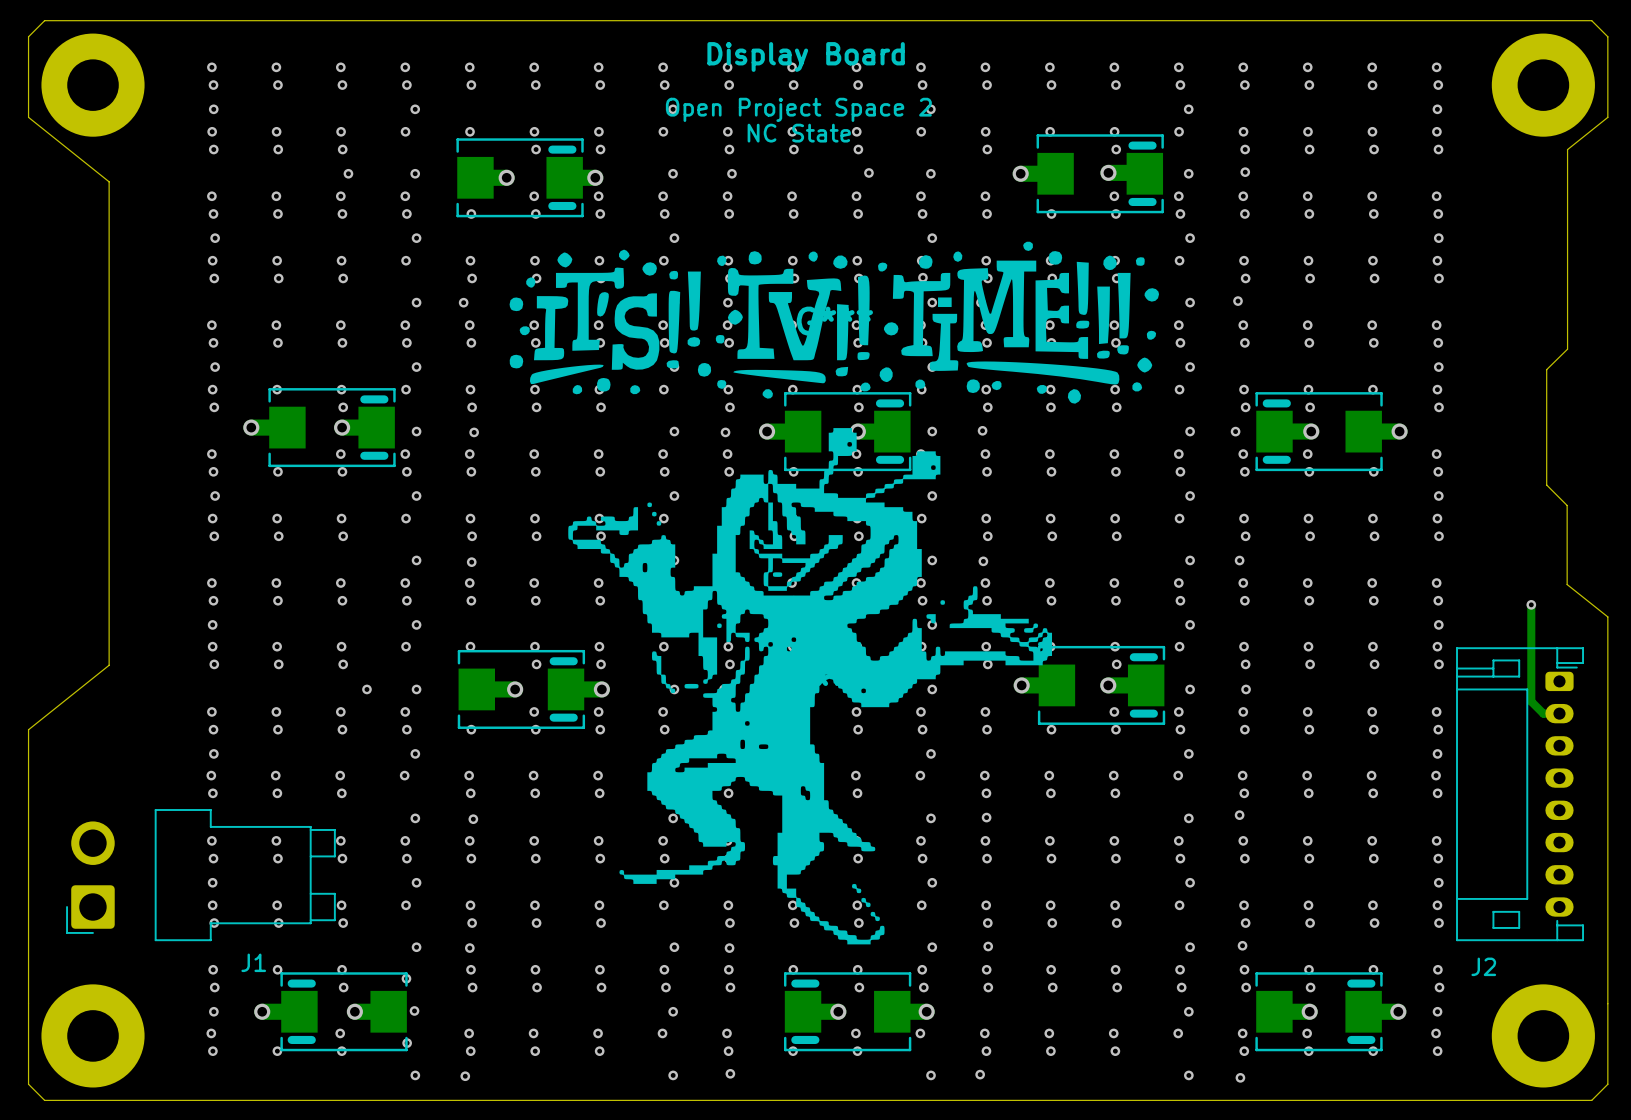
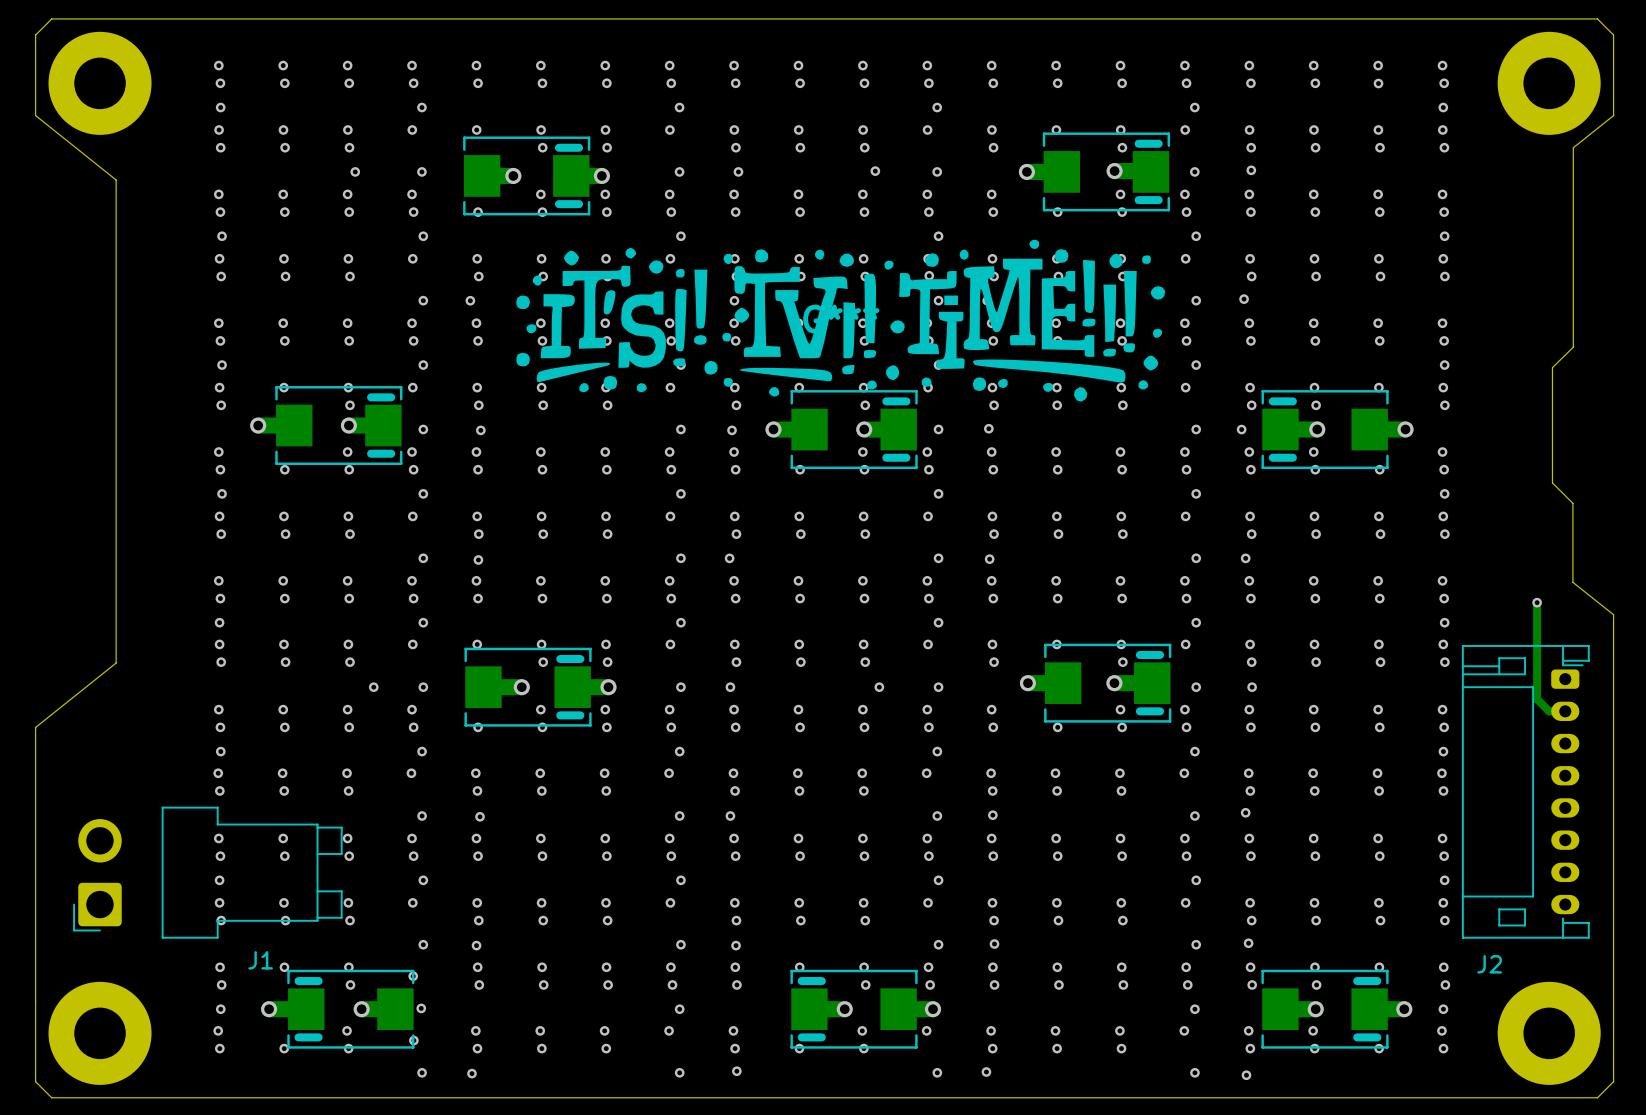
text: Display Board (806, 56) -> none
text: Open Project Space 2 (798, 109) -> none
text: NC State (799, 133) -> none
part: (810, 686) -> none

